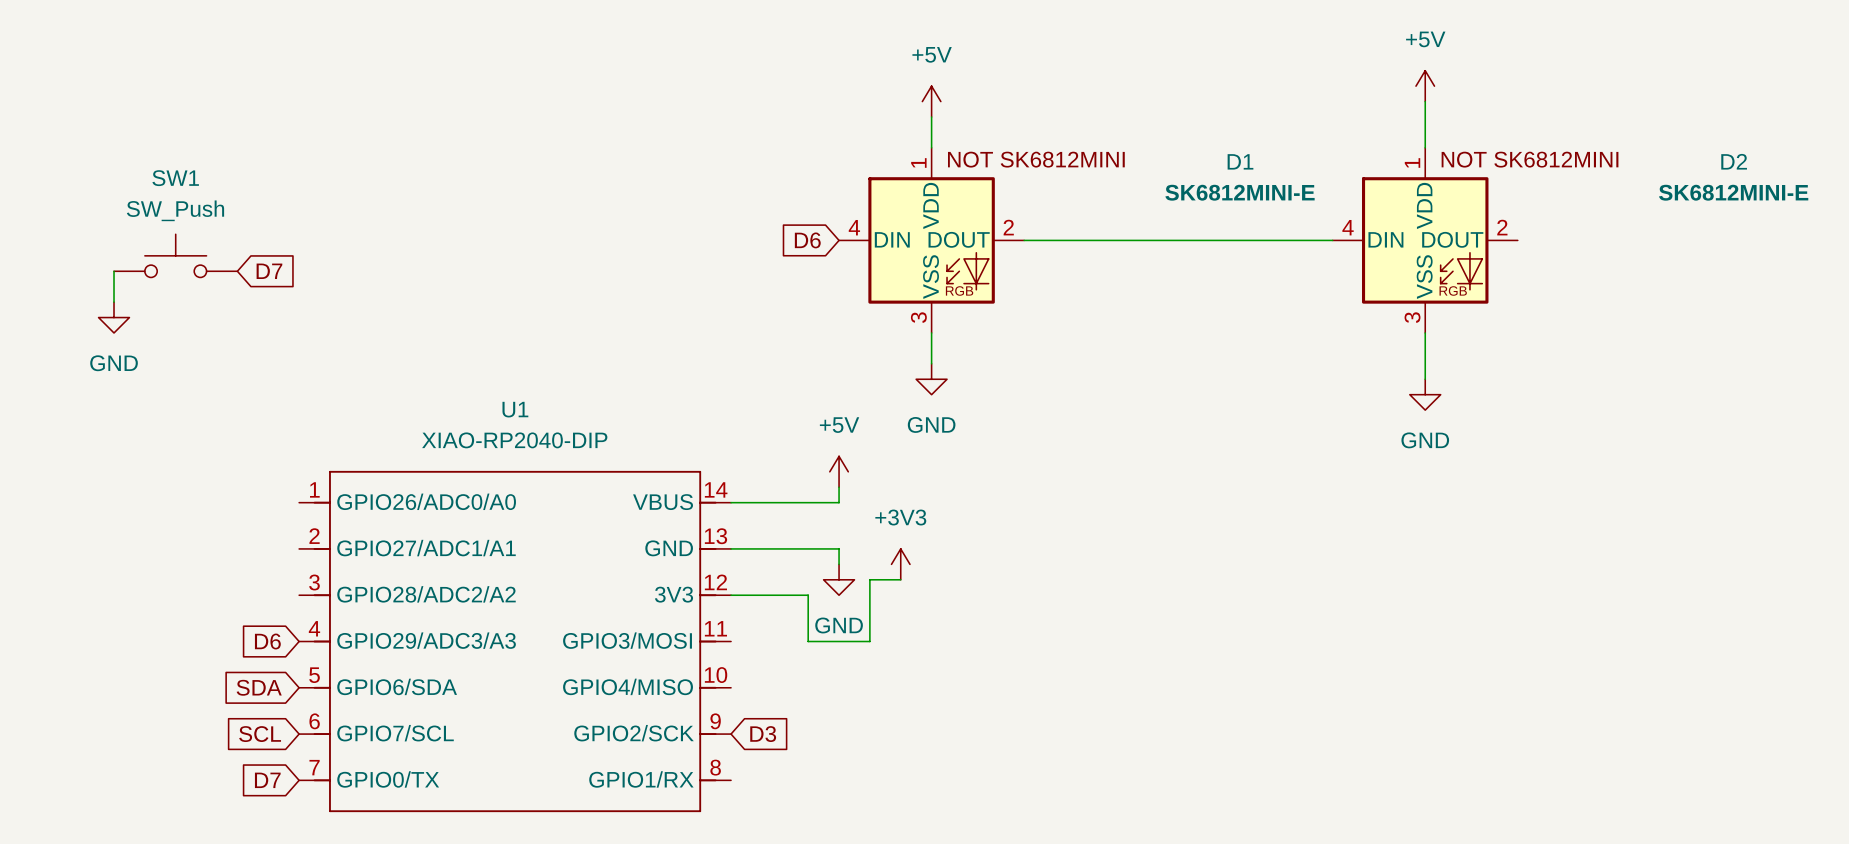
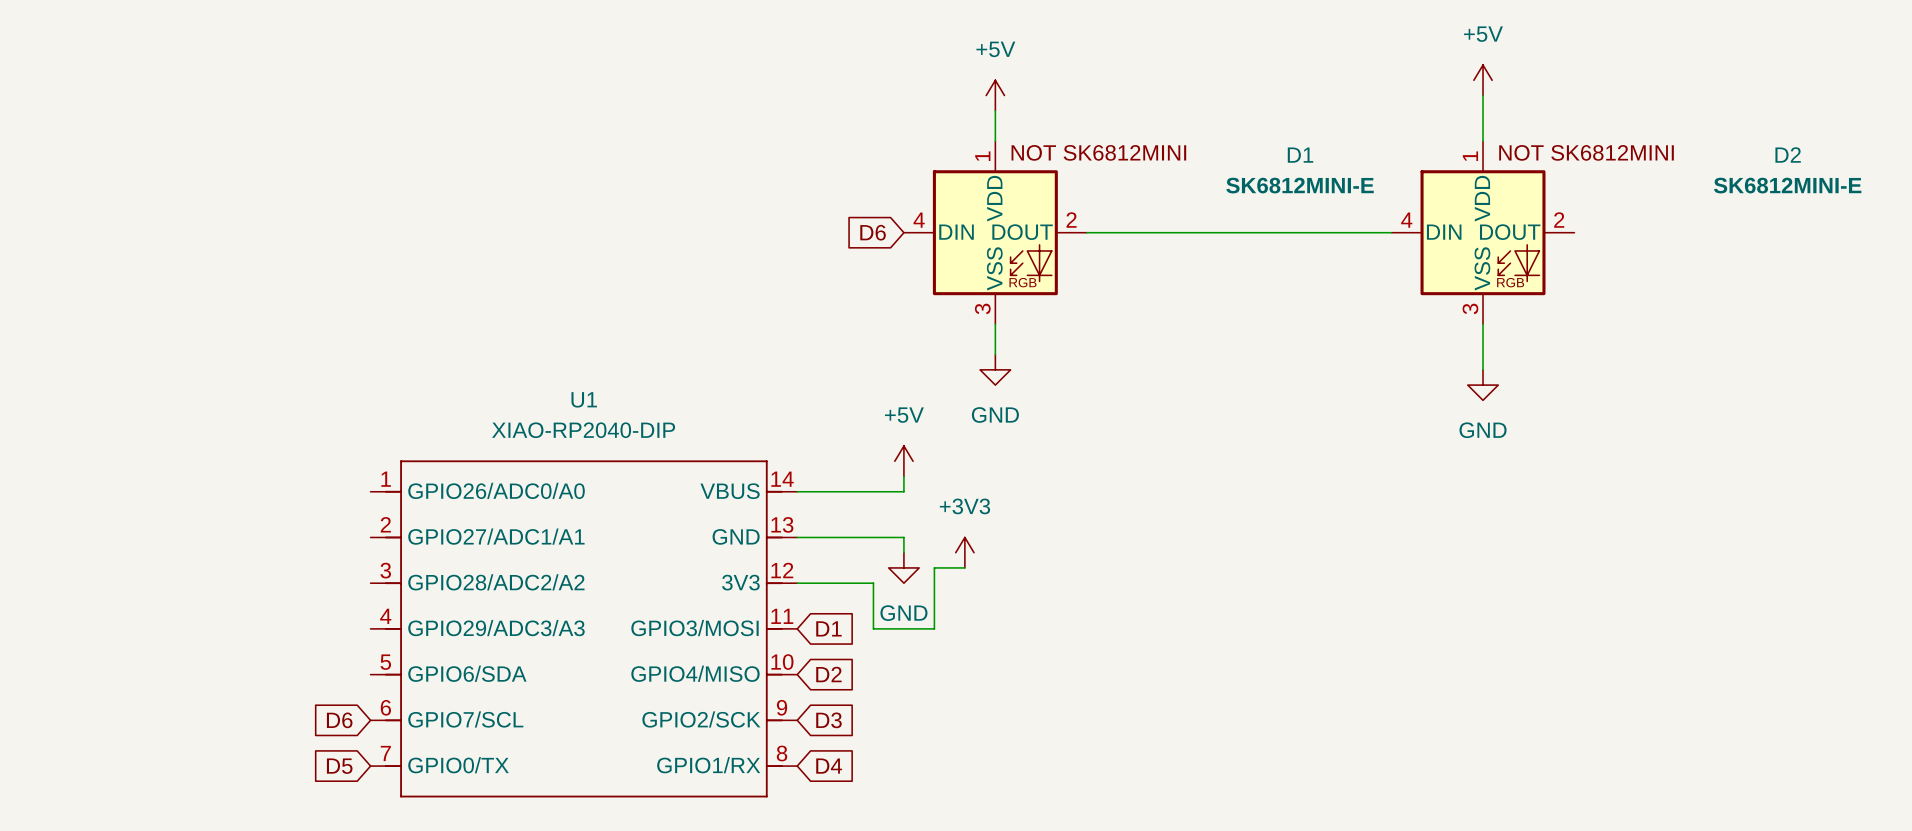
SW1: SW_Push (175, 255) -> none
wire: (114, 271) (114, 302) -> none
global label: D7 (269, 271) -> none
power symbol: GND (114, 317) -> none
global label: D6 (267, 641) -> none
global label: none -> D1 (828, 628)
global label: SDA (259, 687) -> none
global label: none -> D2 (828, 674)
global label: SCL (260, 734) -> D6 (339, 720)
global label: D7 (267, 780) -> D5 (339, 766)
global label: none -> D4 (829, 766)

